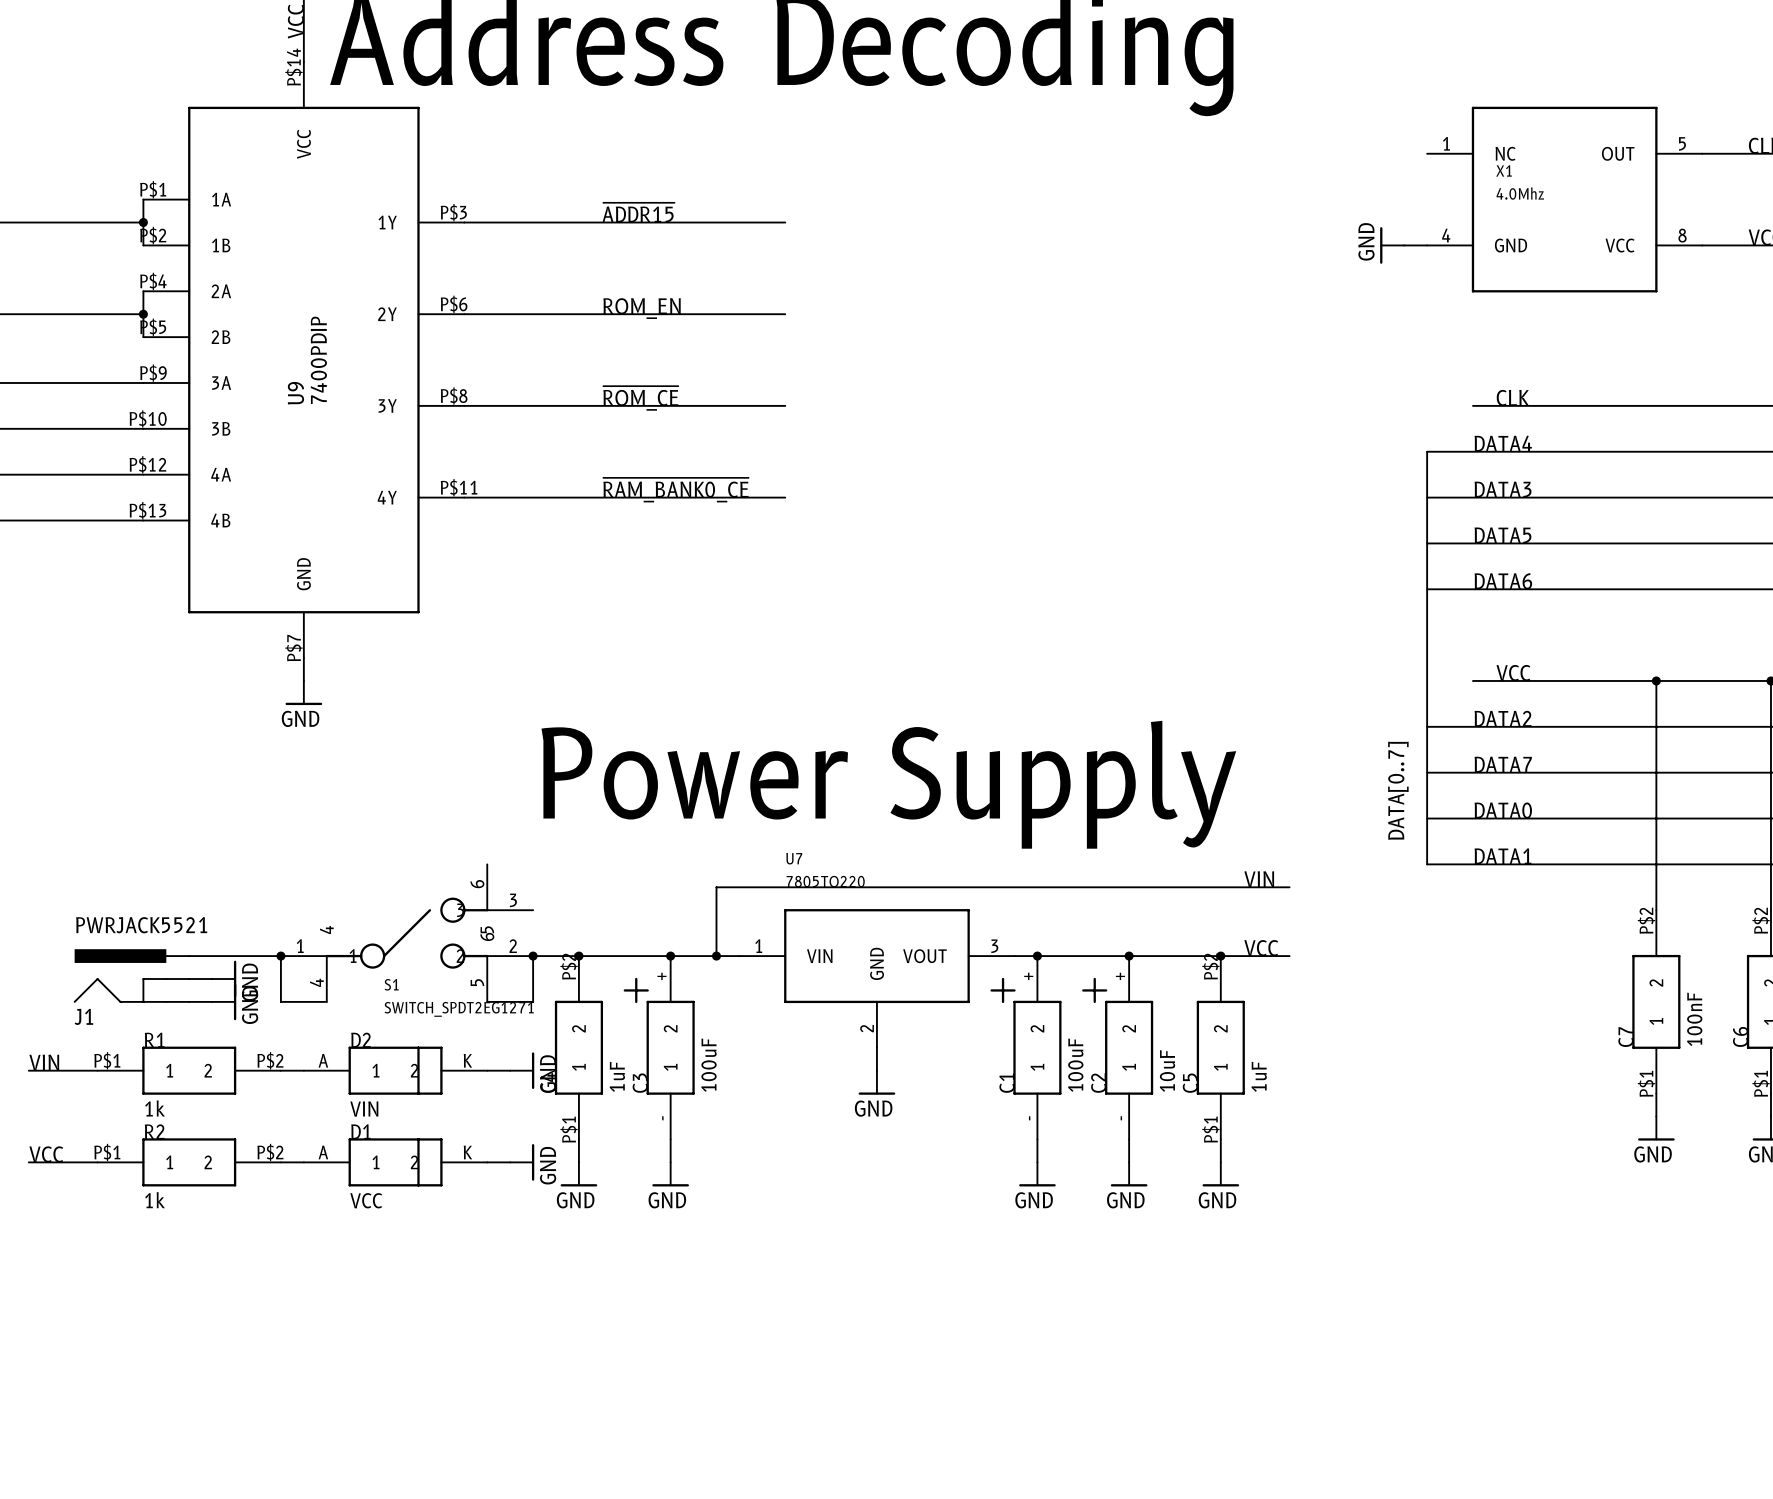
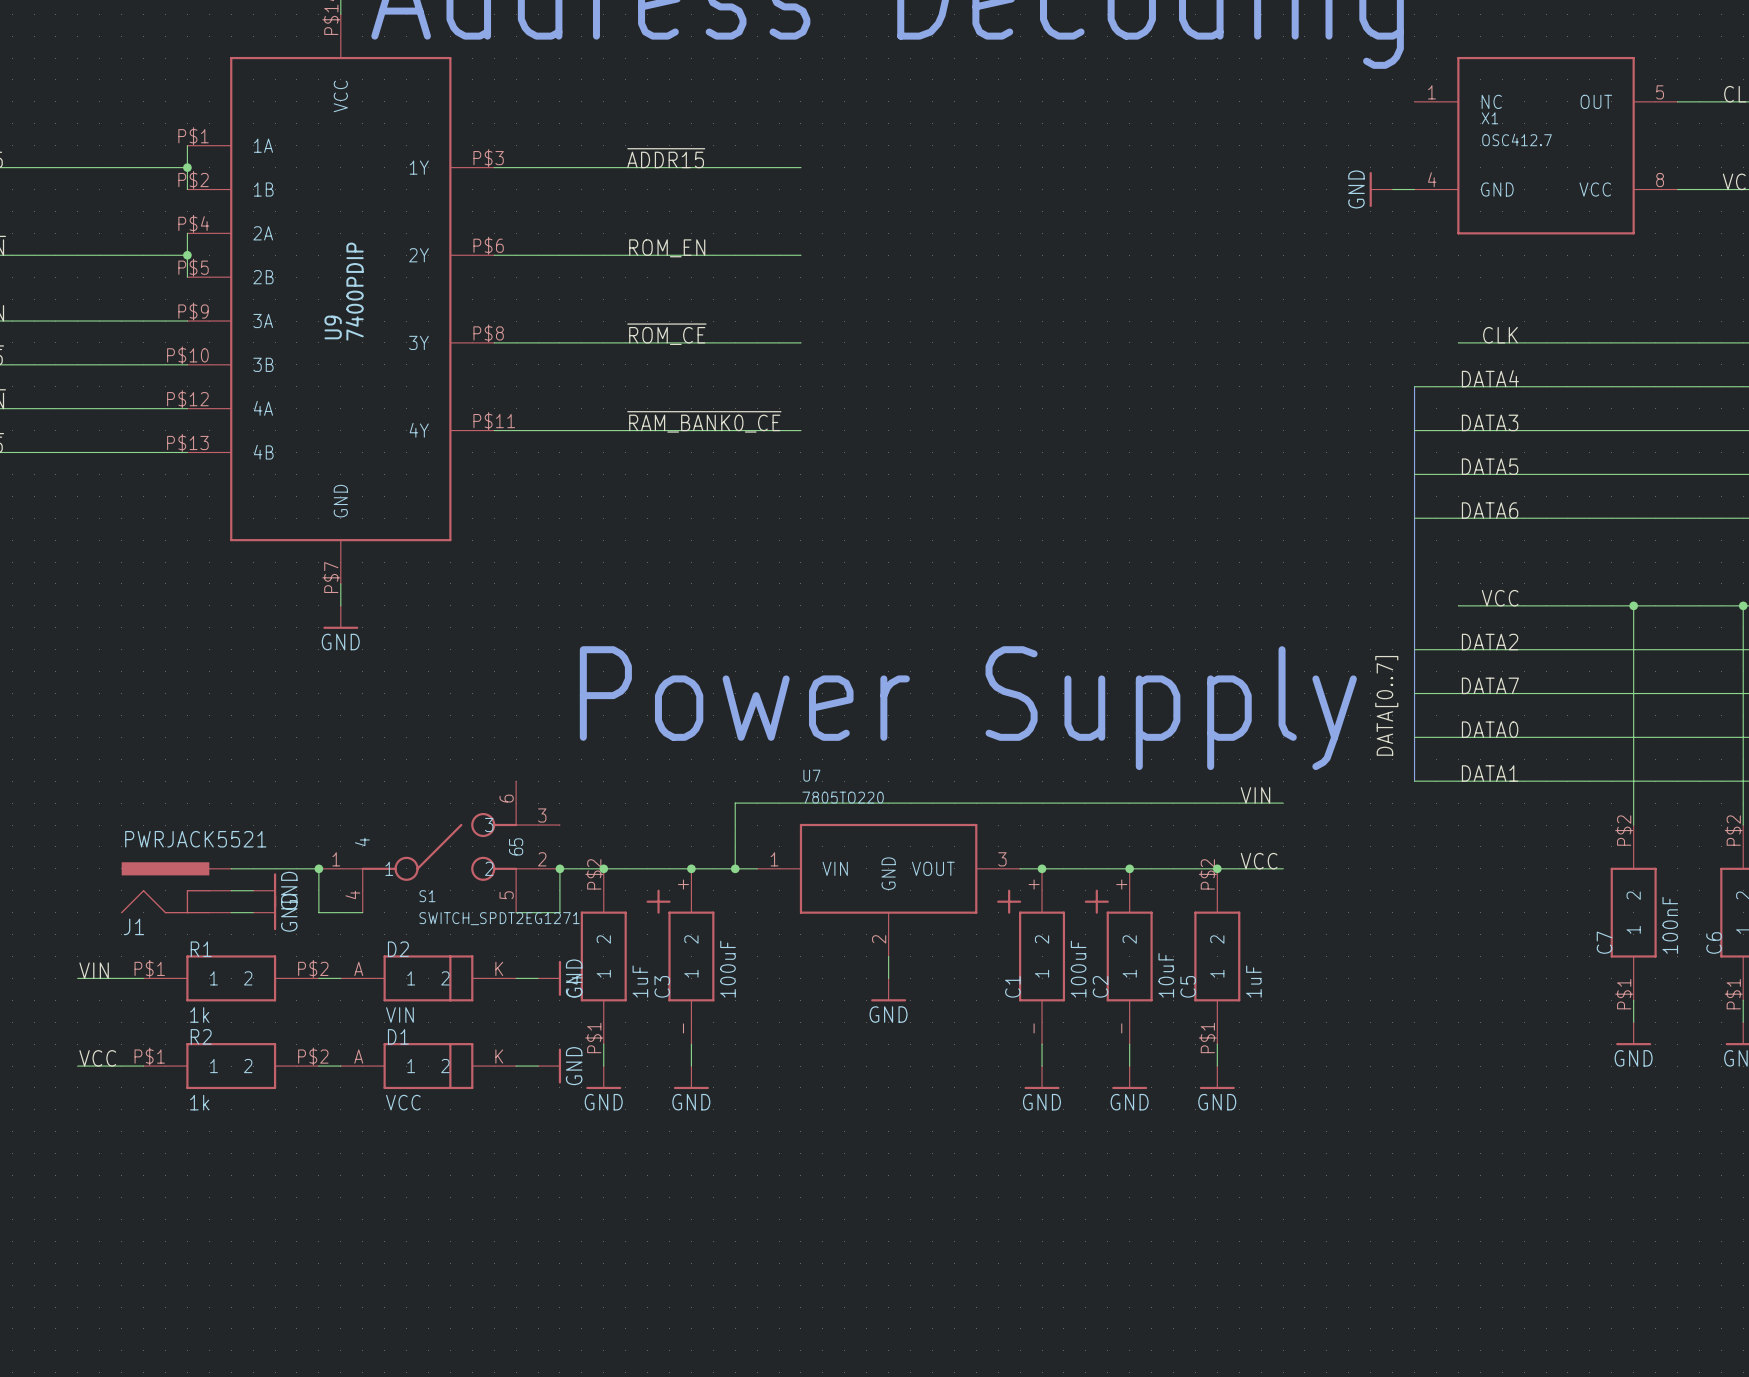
X1 value: 4.0Mhz (1520, 193) -> OSC412.7 (1517, 139)

